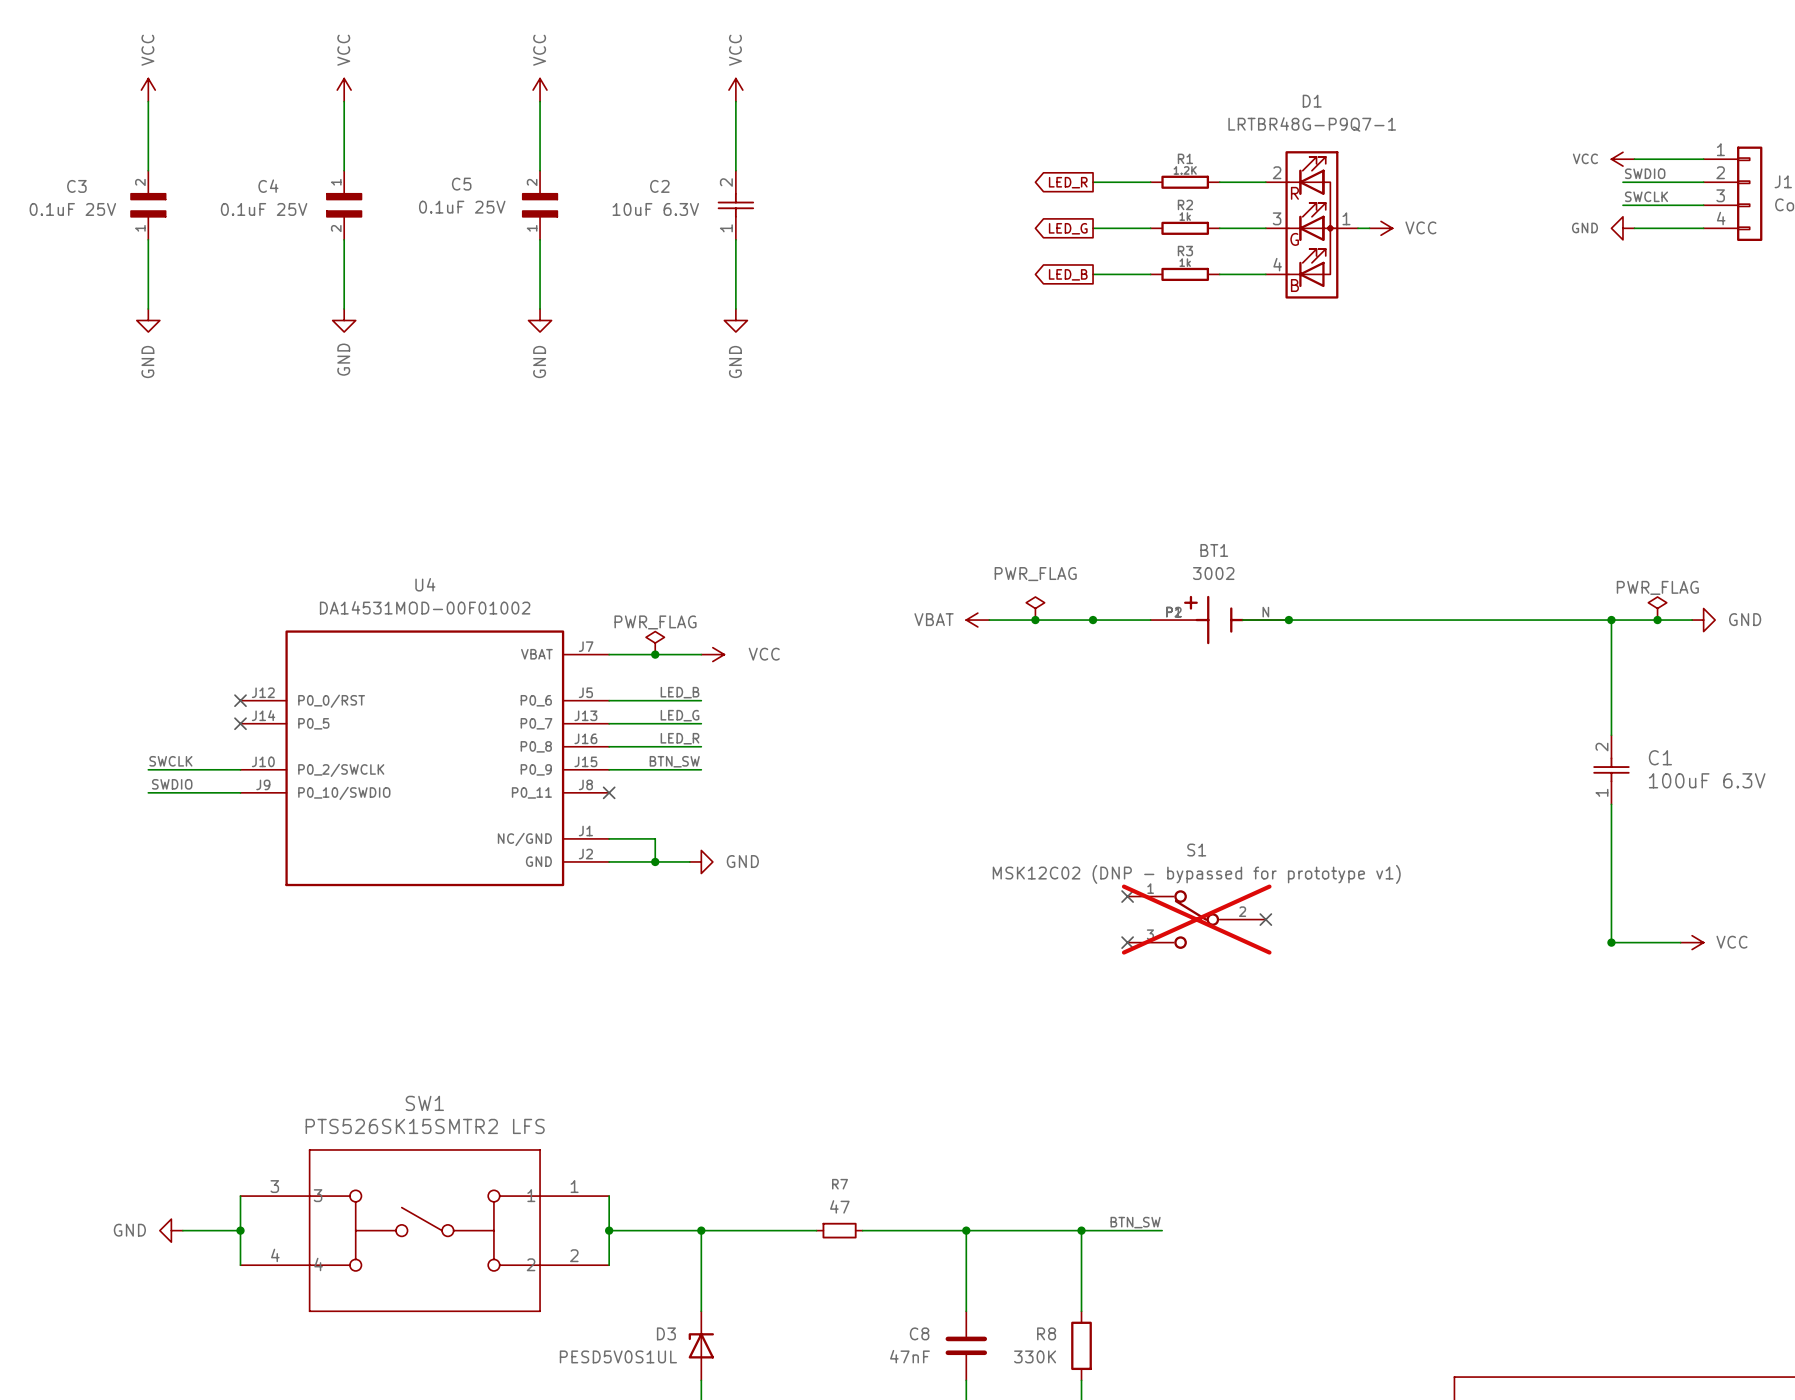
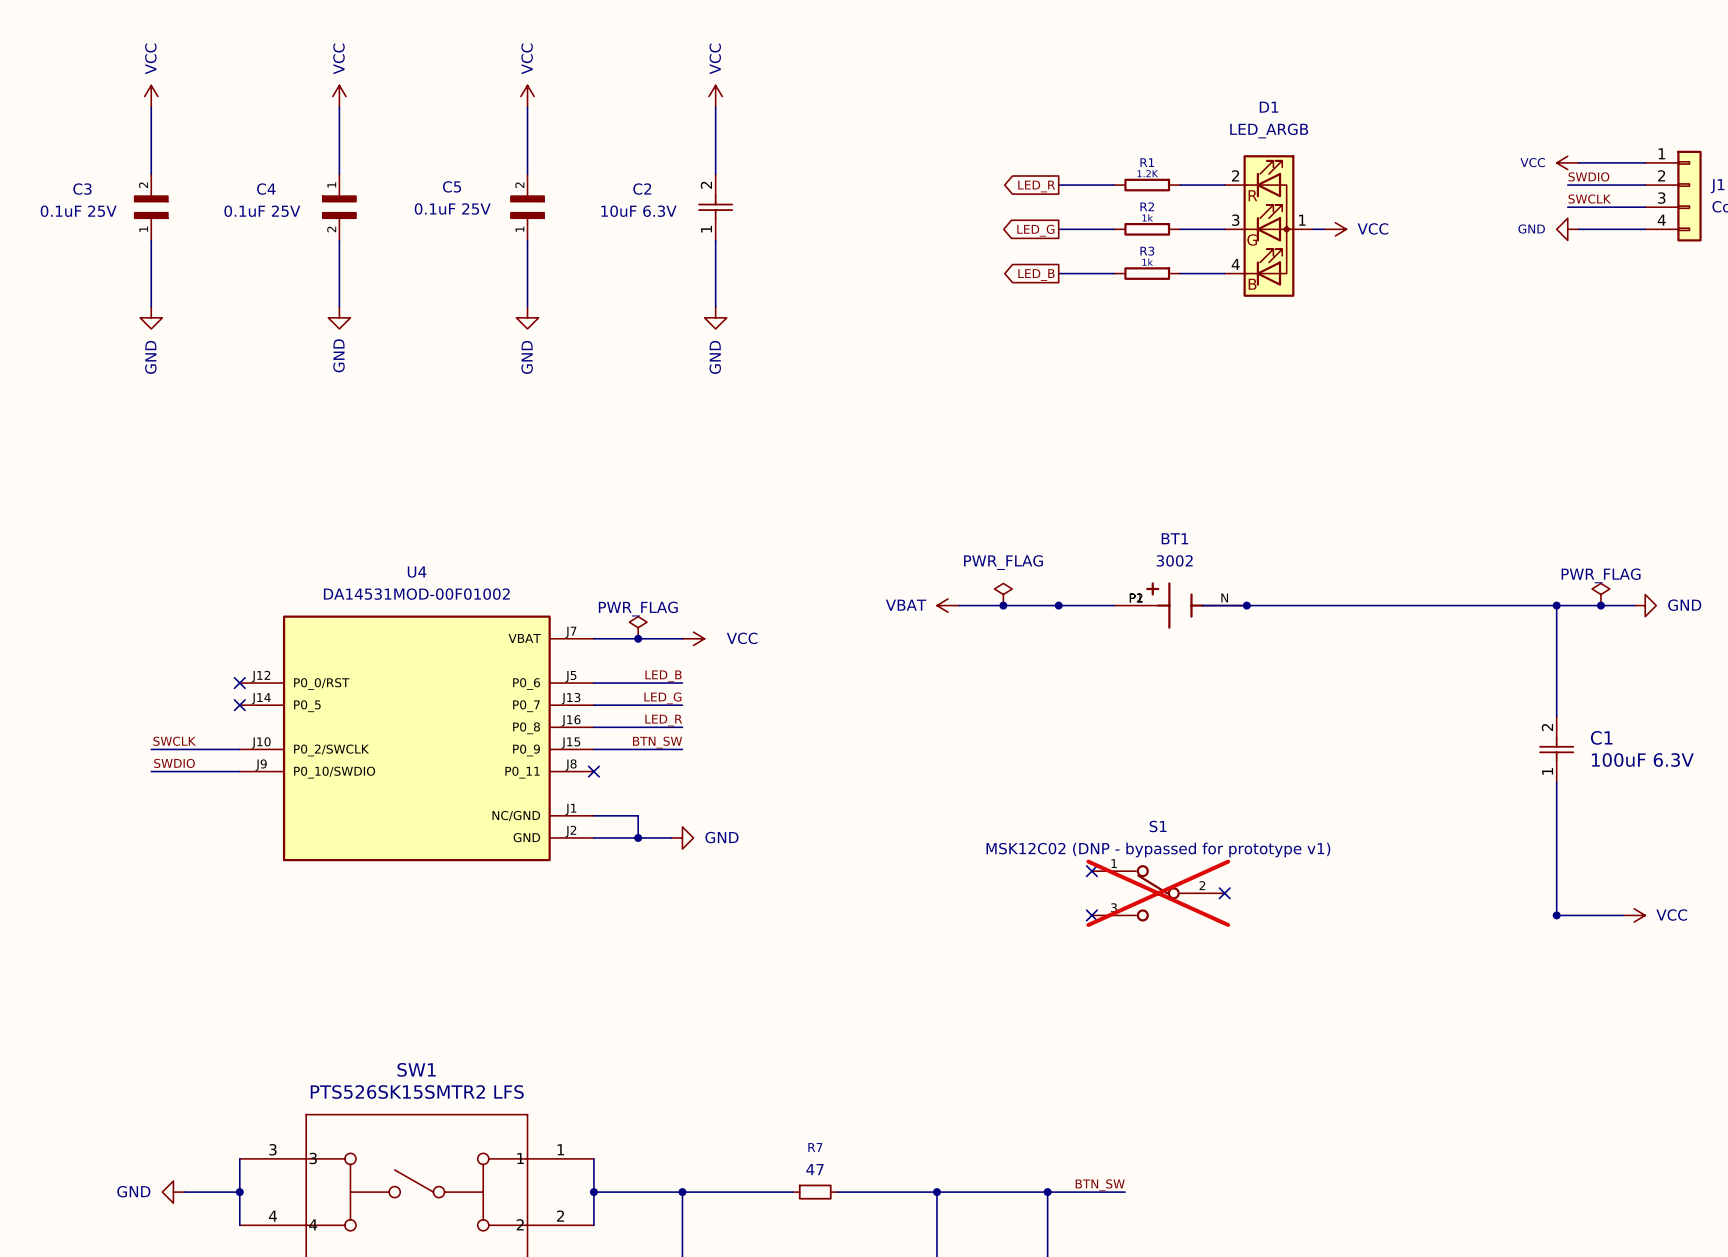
D1 value: LRTBR48G-P9Q7-1 (1312, 124) -> LED_ARGB (1269, 131)

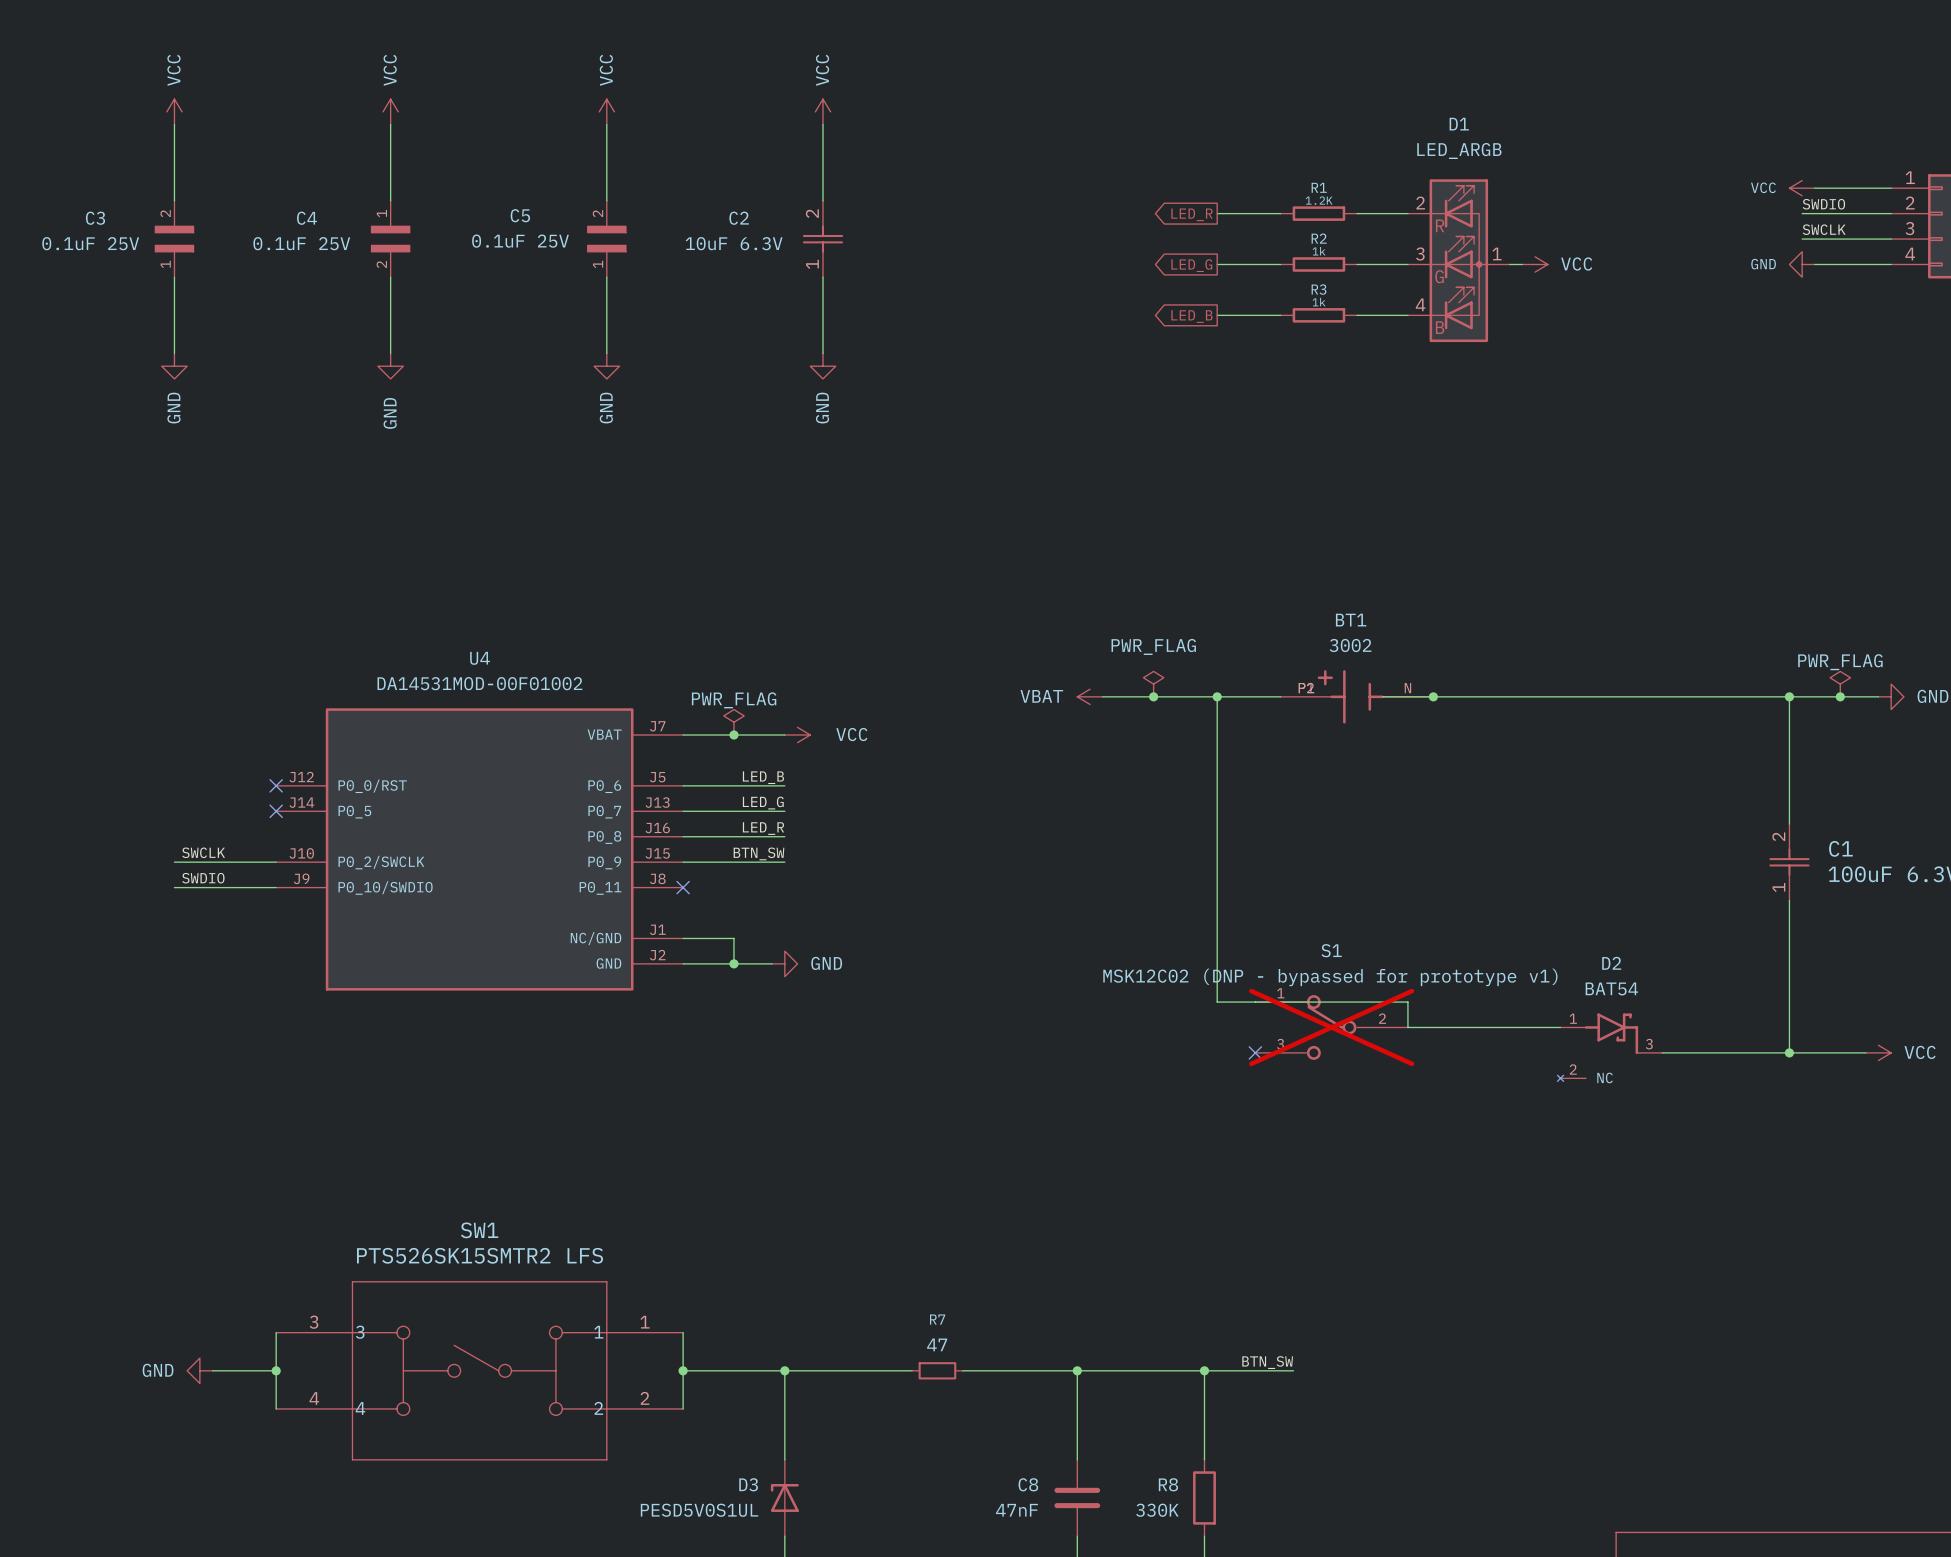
wire: none -> (1217, 696) (1217, 1002) (1407, 1002) (1407, 1027) (1560, 1027)
no-connect mark: (1091, 871) -> none
no-connect mark: (1224, 893) -> none
D2: none -> BAT54 (1609, 1047)
wire: none -> (1662, 1052) (1789, 1052)

